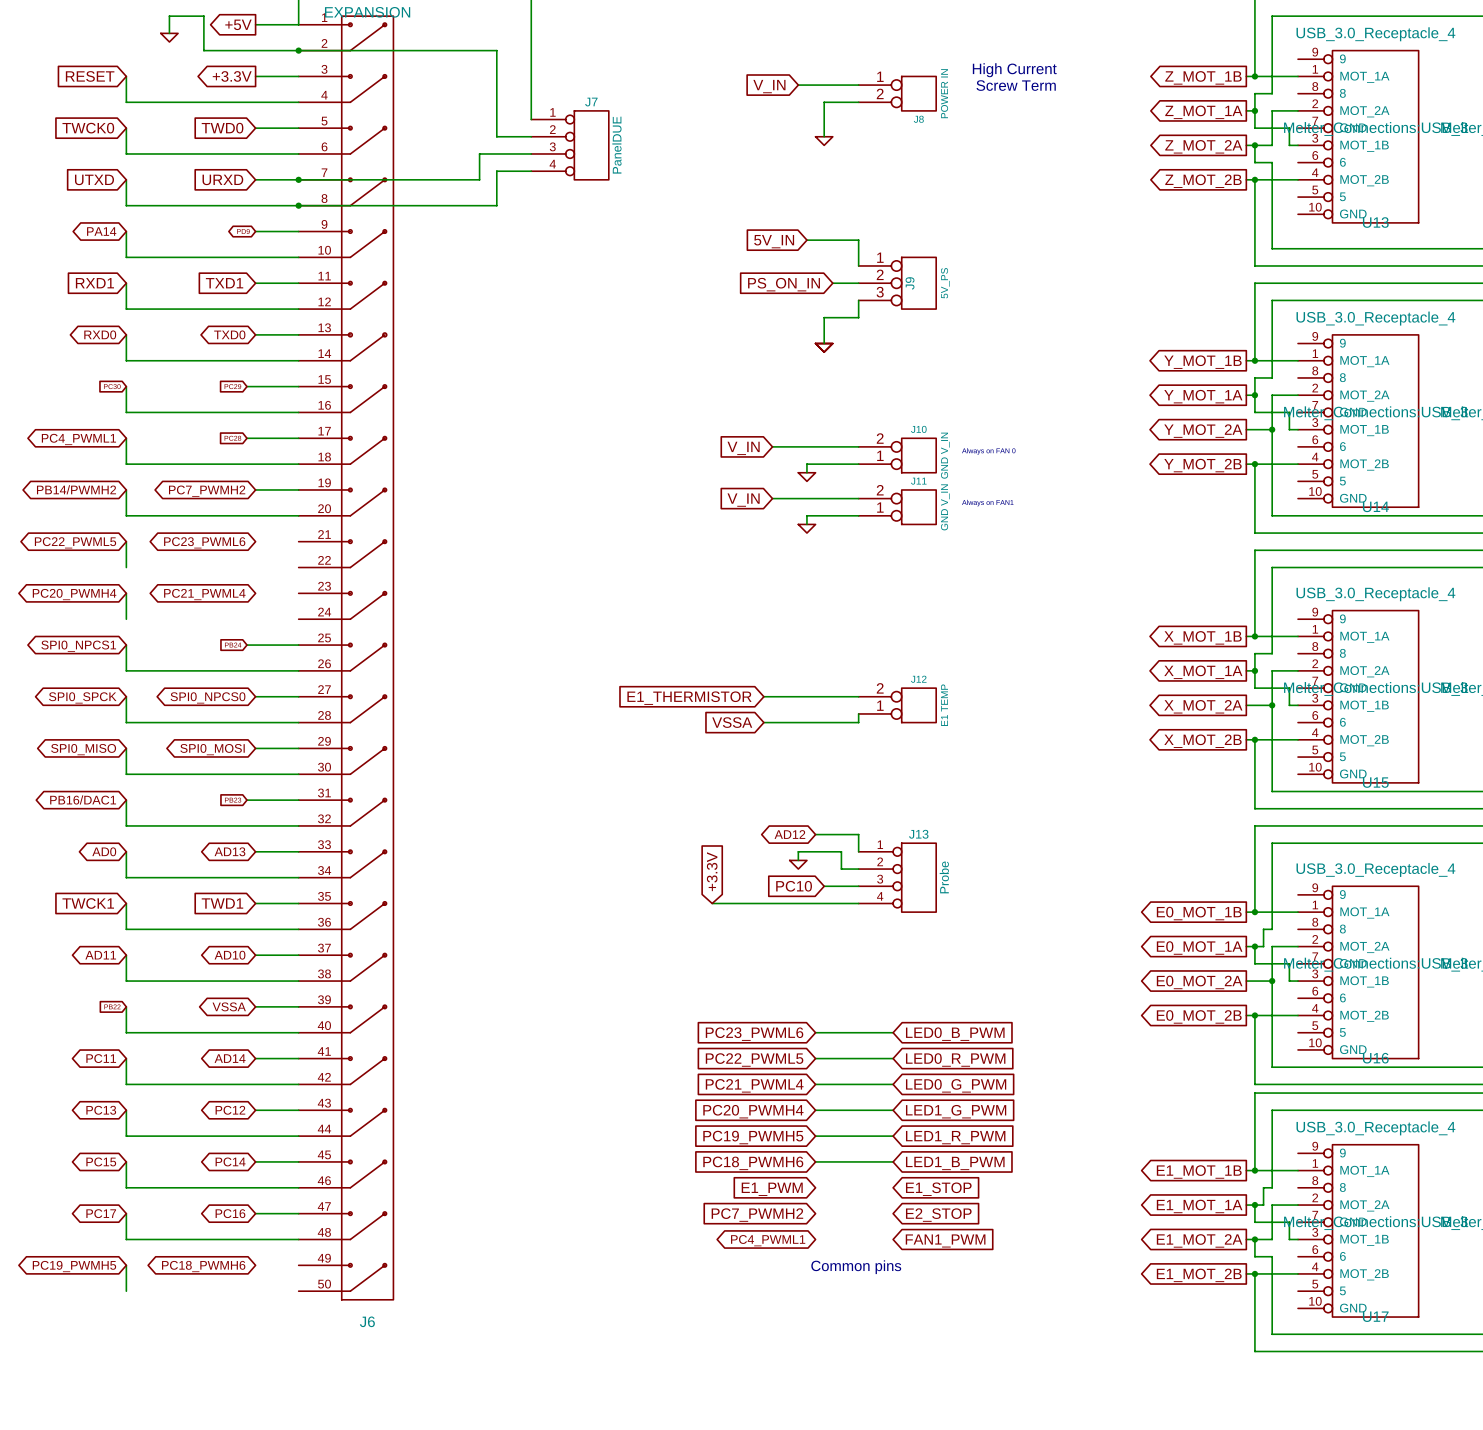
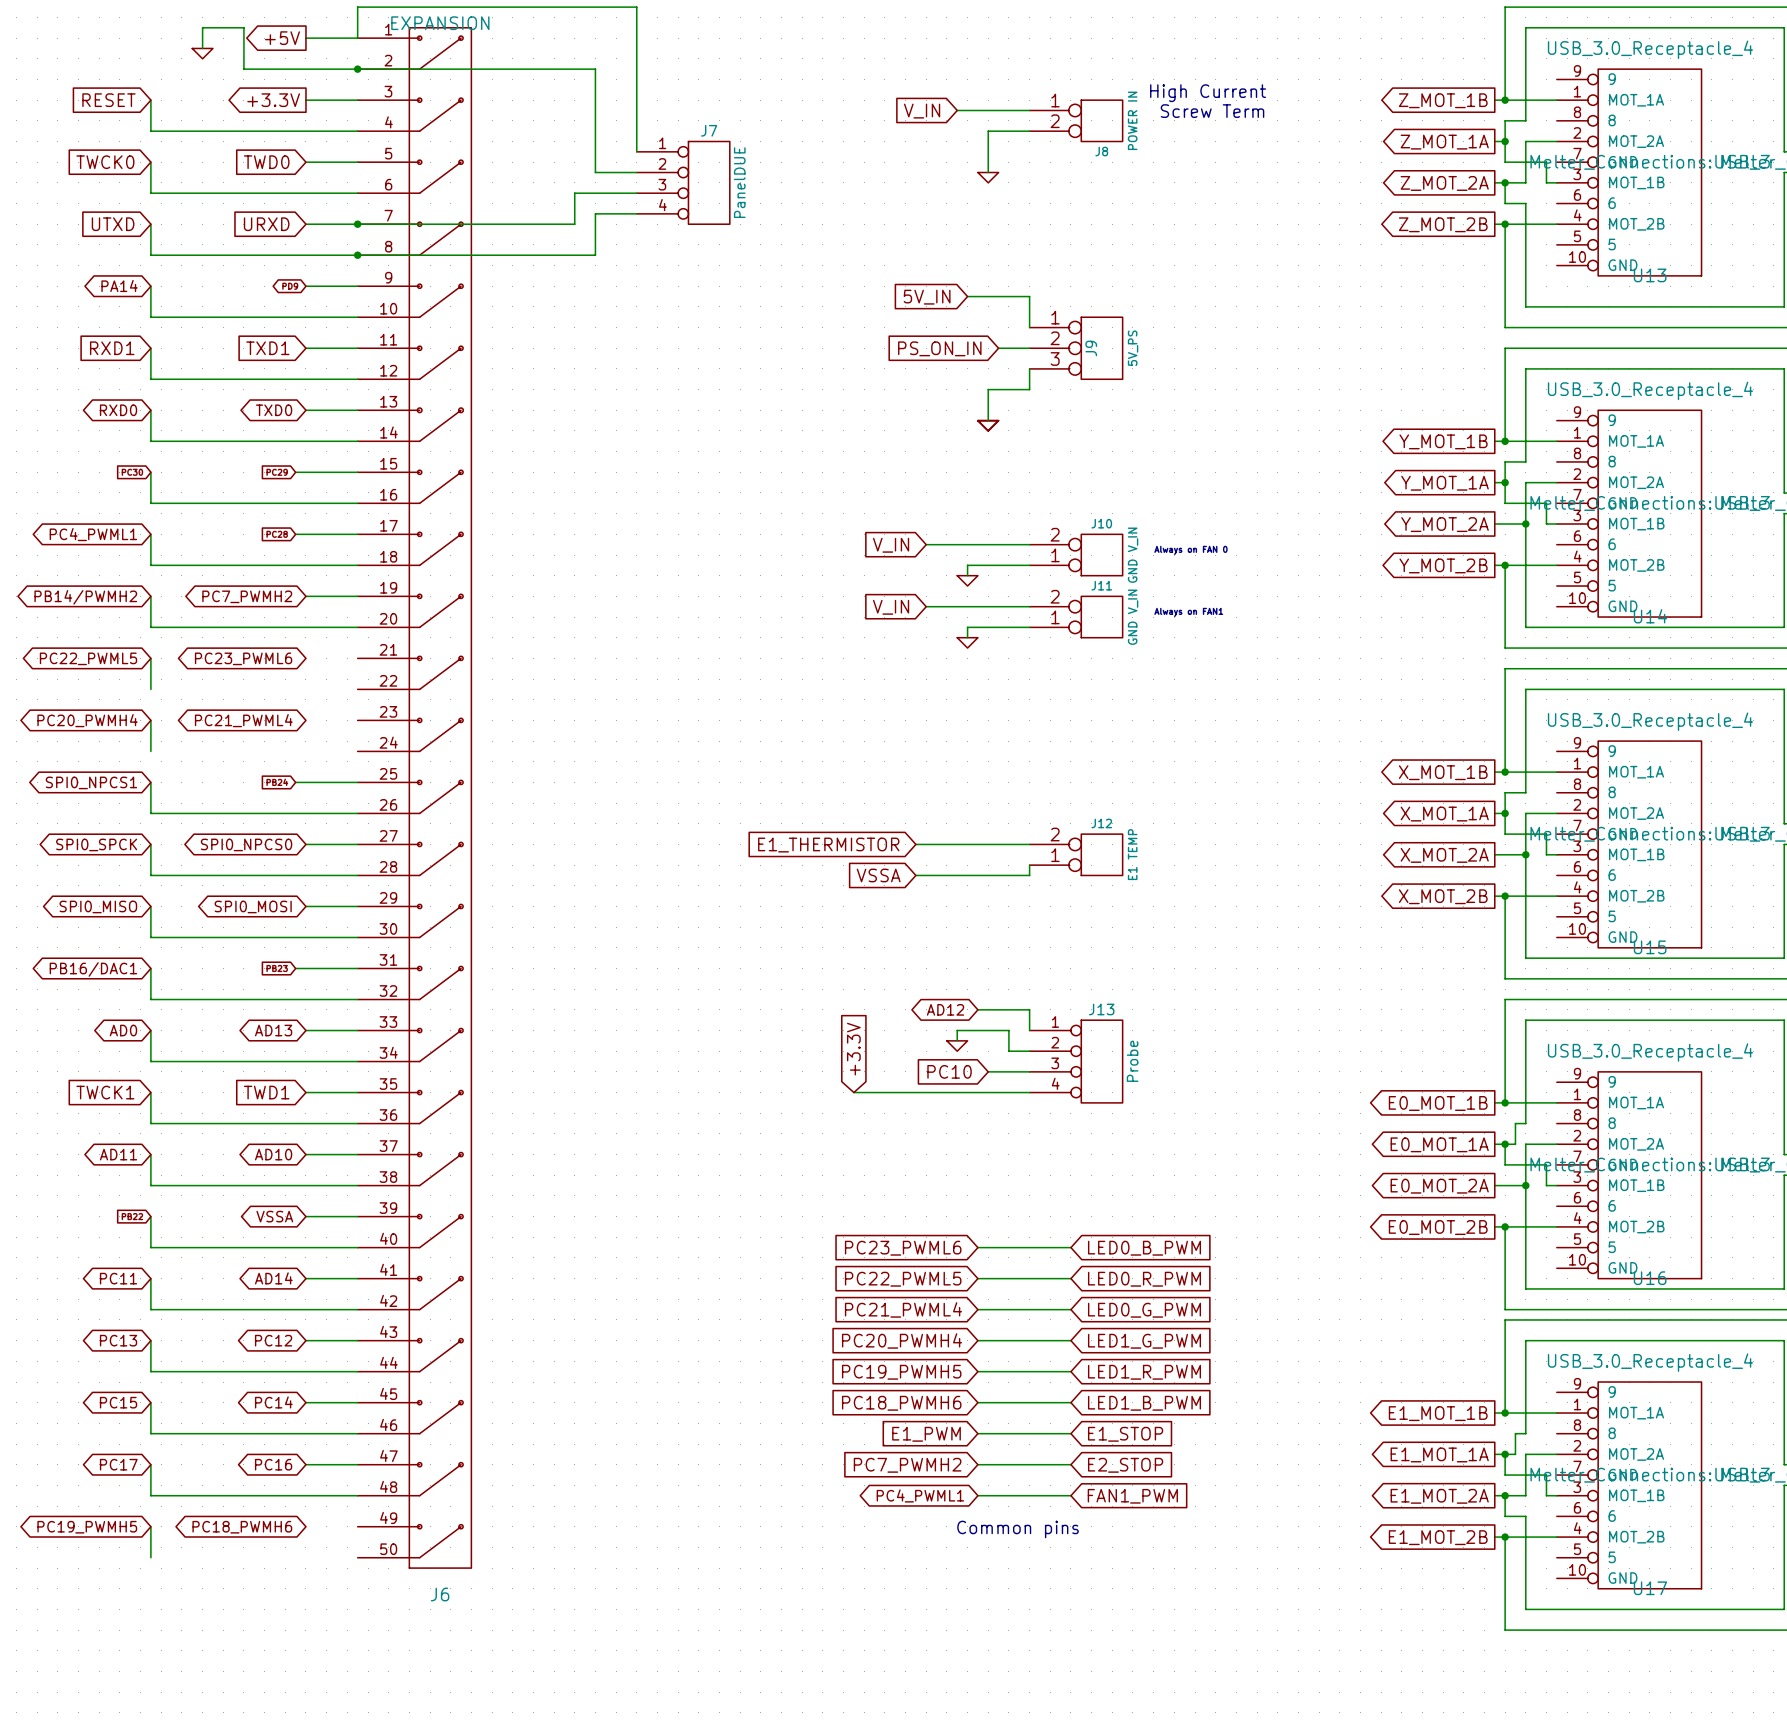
wire: none -> (977, 1433) (1070, 1433)
wire: none -> (977, 1464) (1070, 1464)
wire: none -> (977, 1495) (1070, 1495)

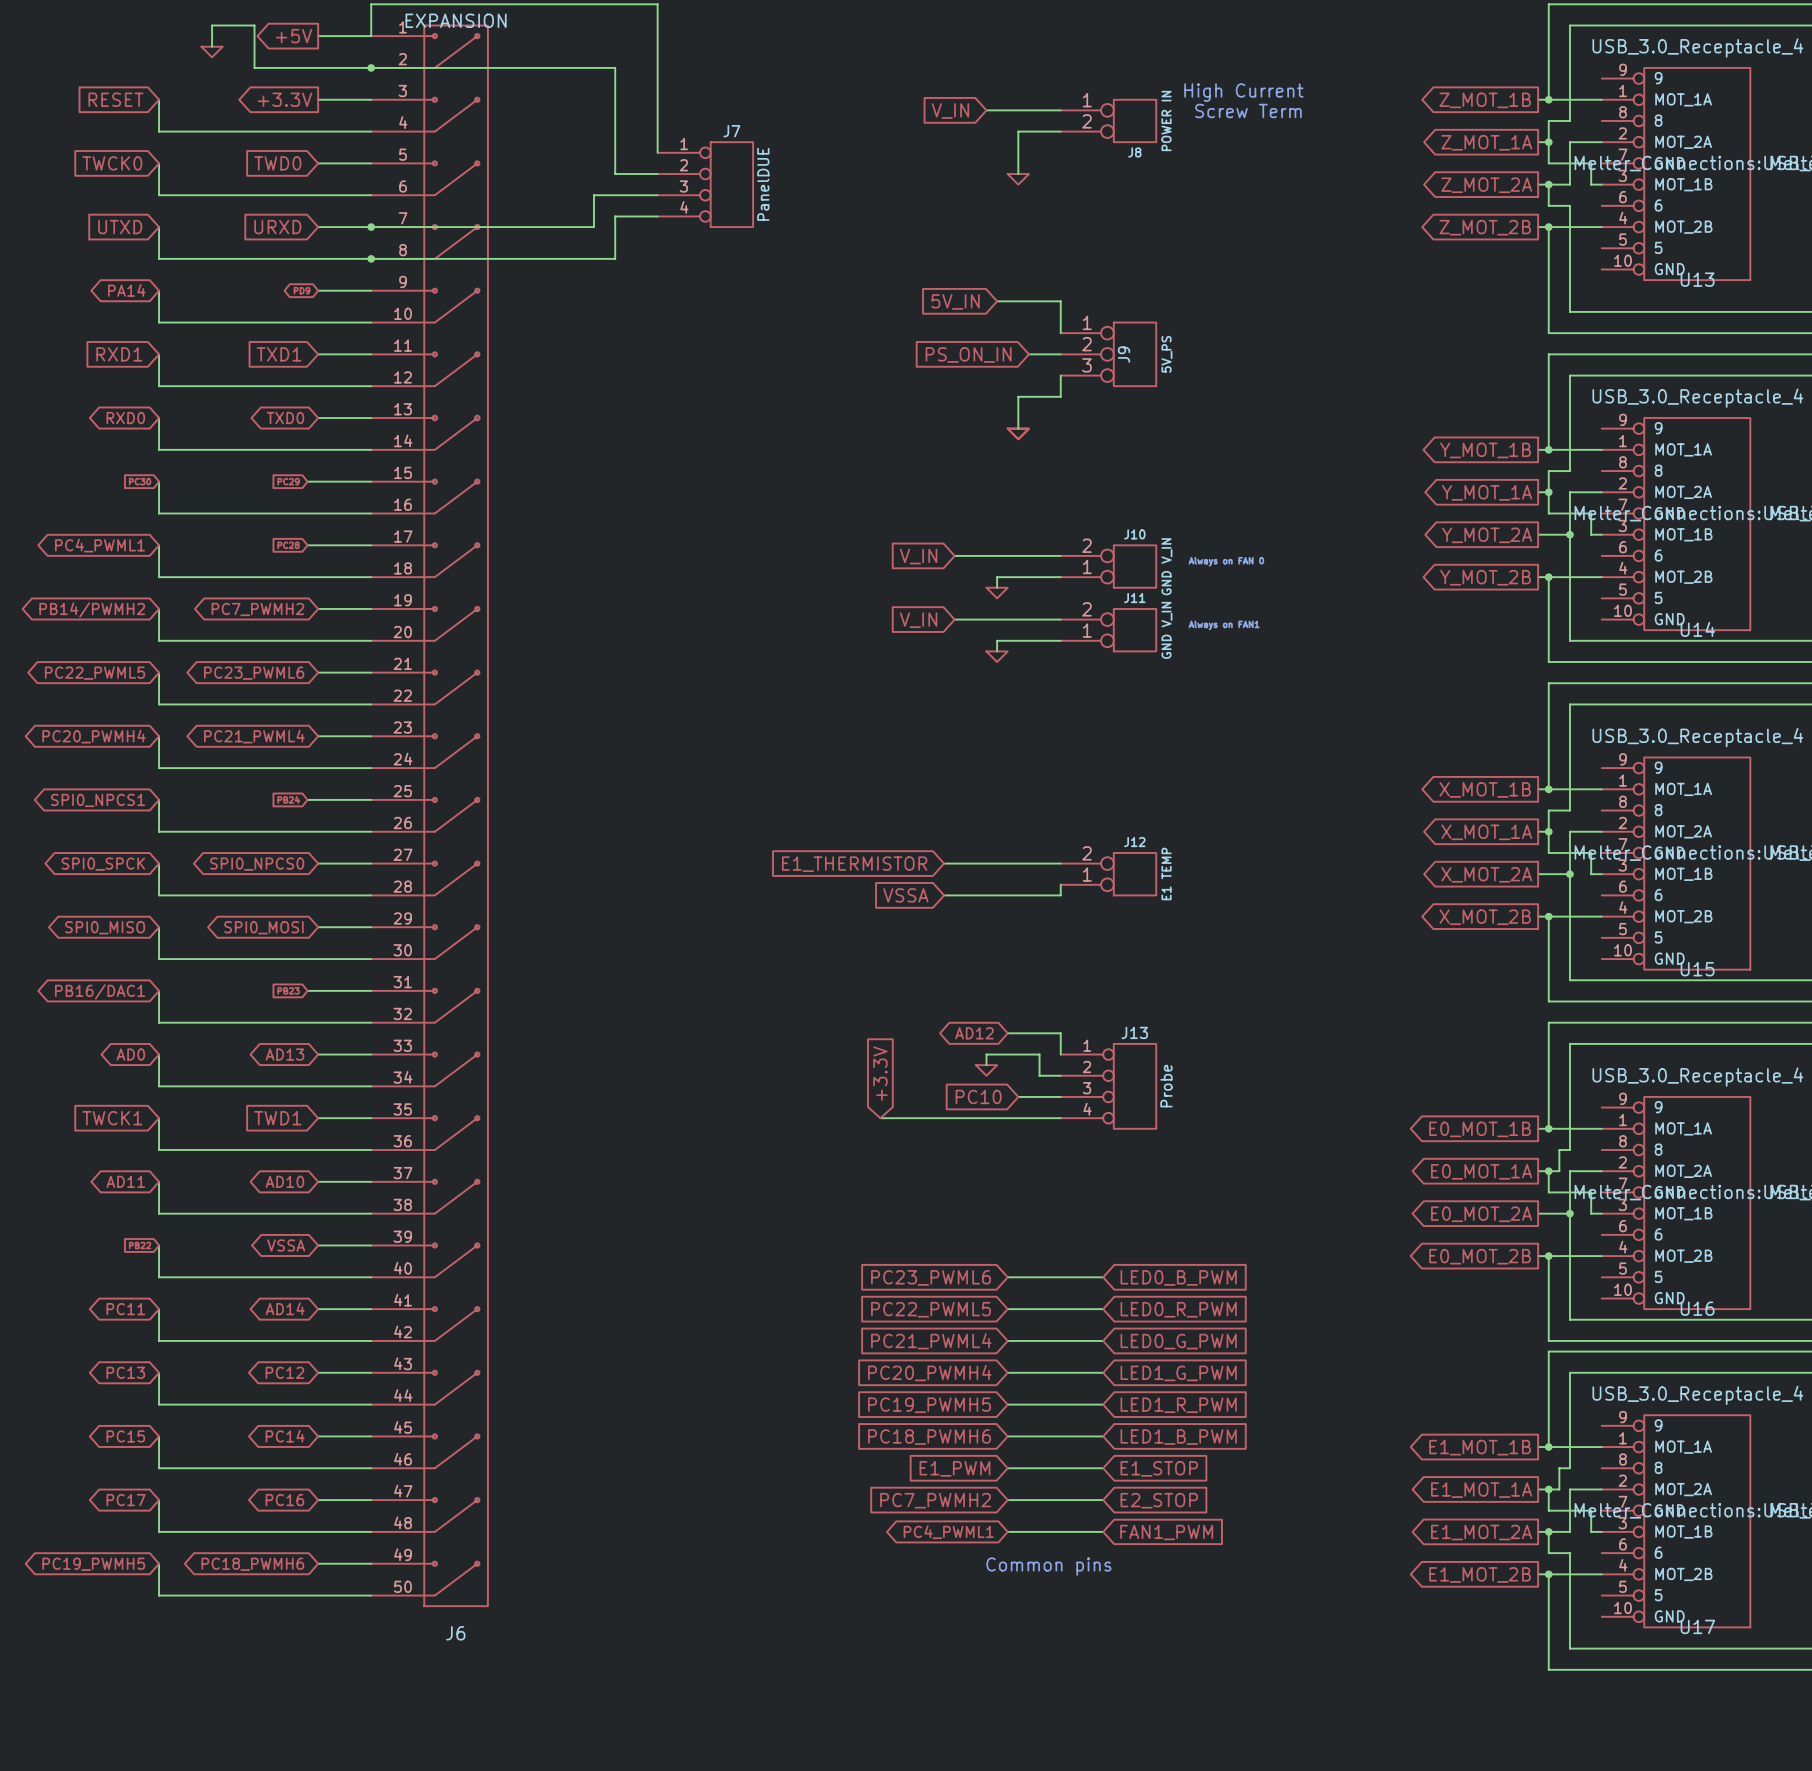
wire: none -> (318, 672) (371, 672)
wire: none -> (159, 704) (371, 704)
wire: none -> (318, 736) (371, 736)
wire: none -> (159, 768) (371, 768)
wire: none -> (318, 1563) (371, 1563)
wire: none -> (159, 1595) (371, 1595)

